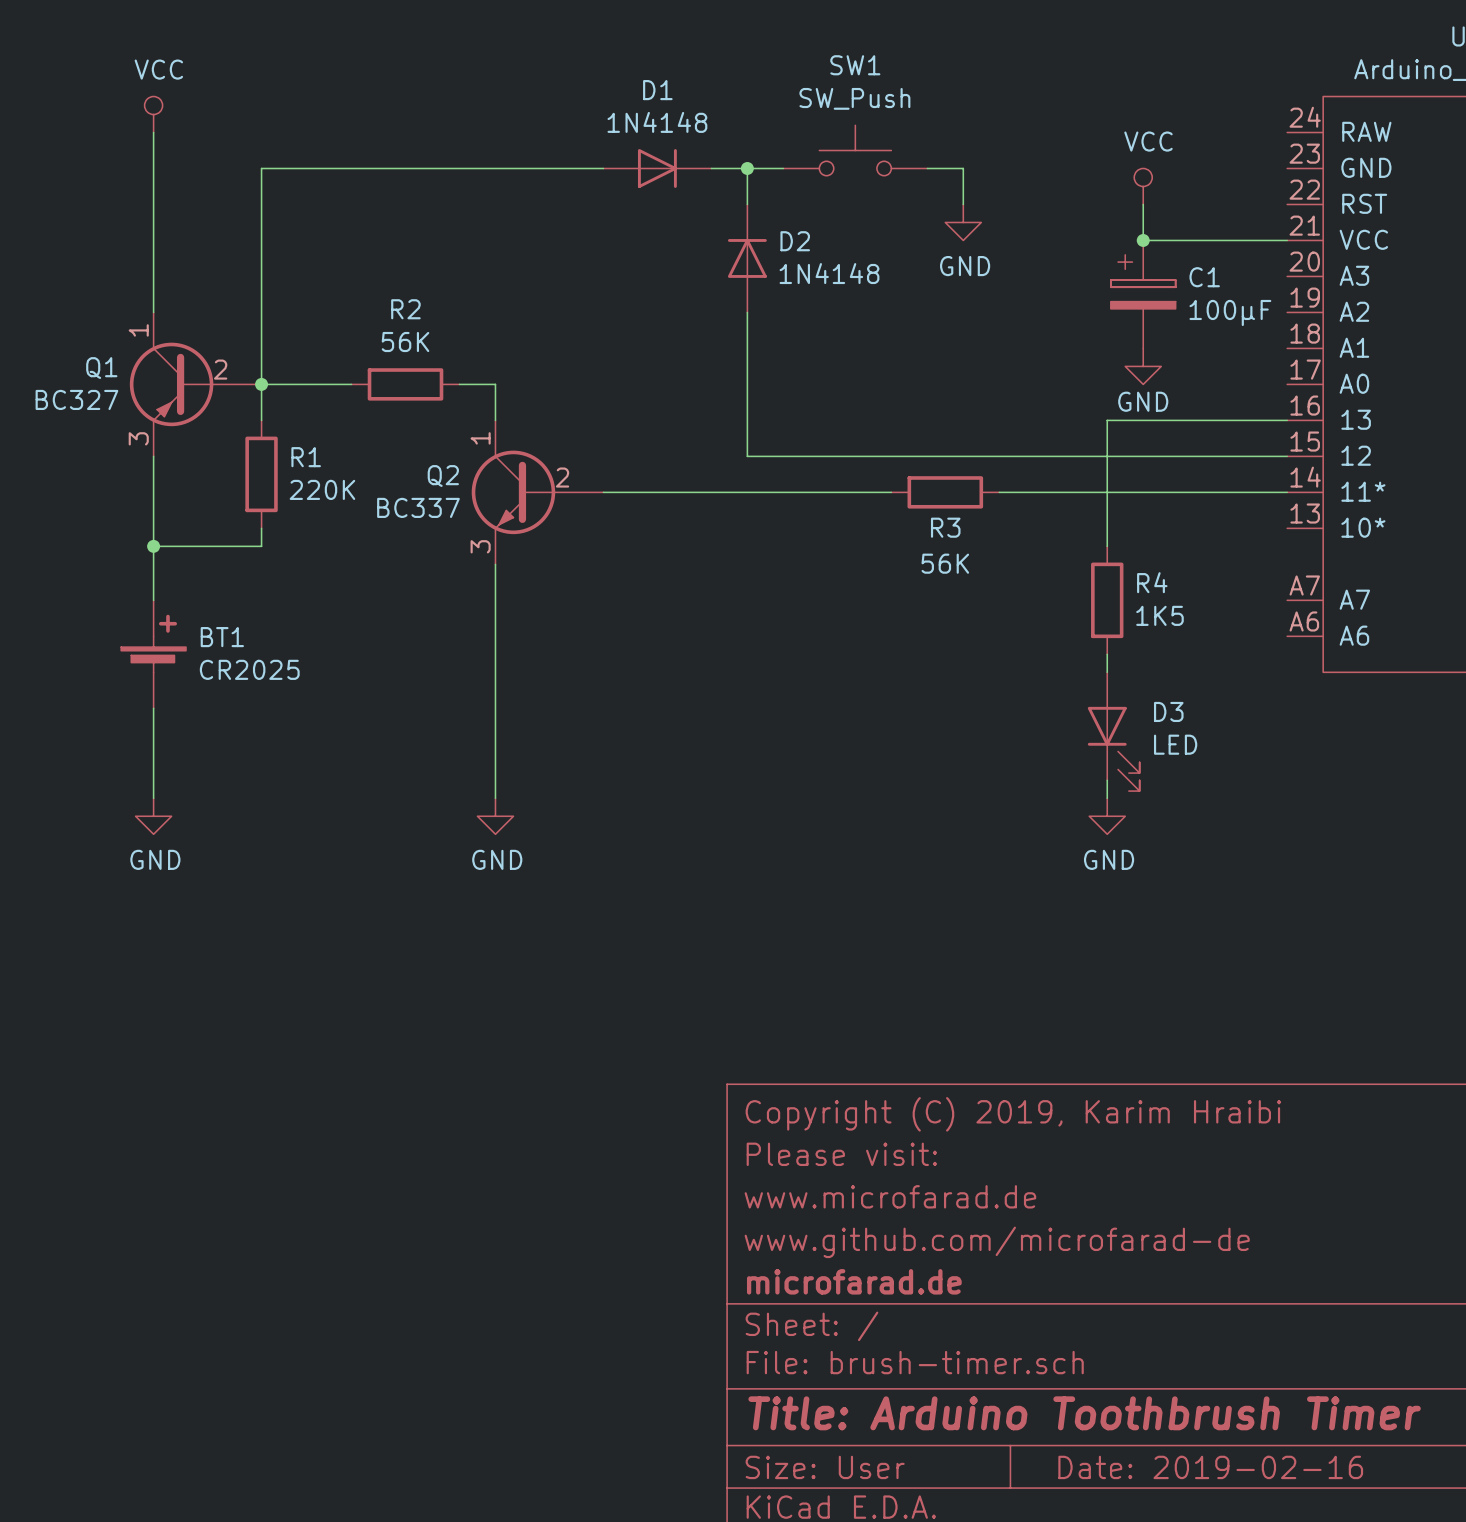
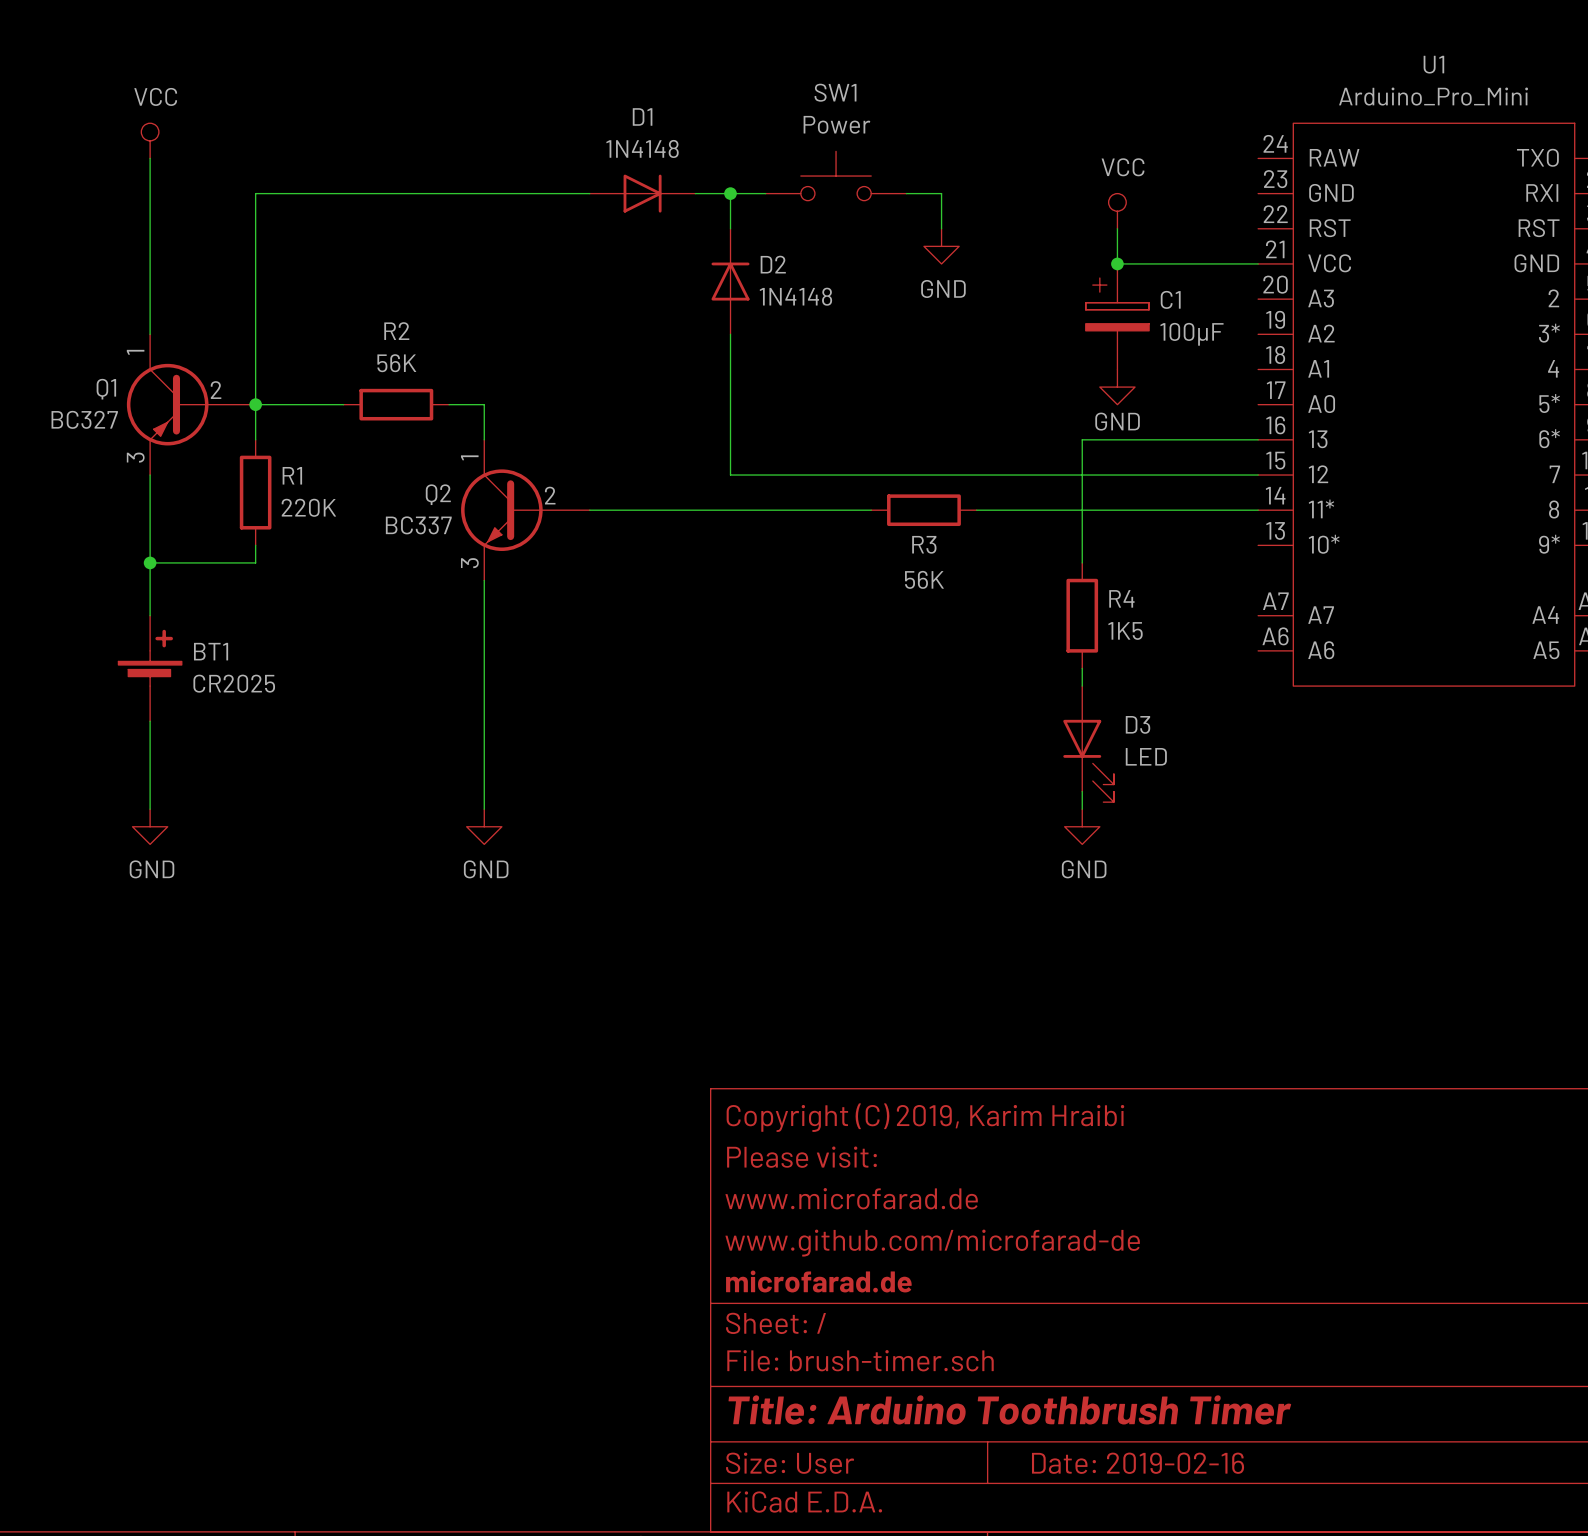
SW1 value: SW_Push (854, 98) -> Power (836, 124)

